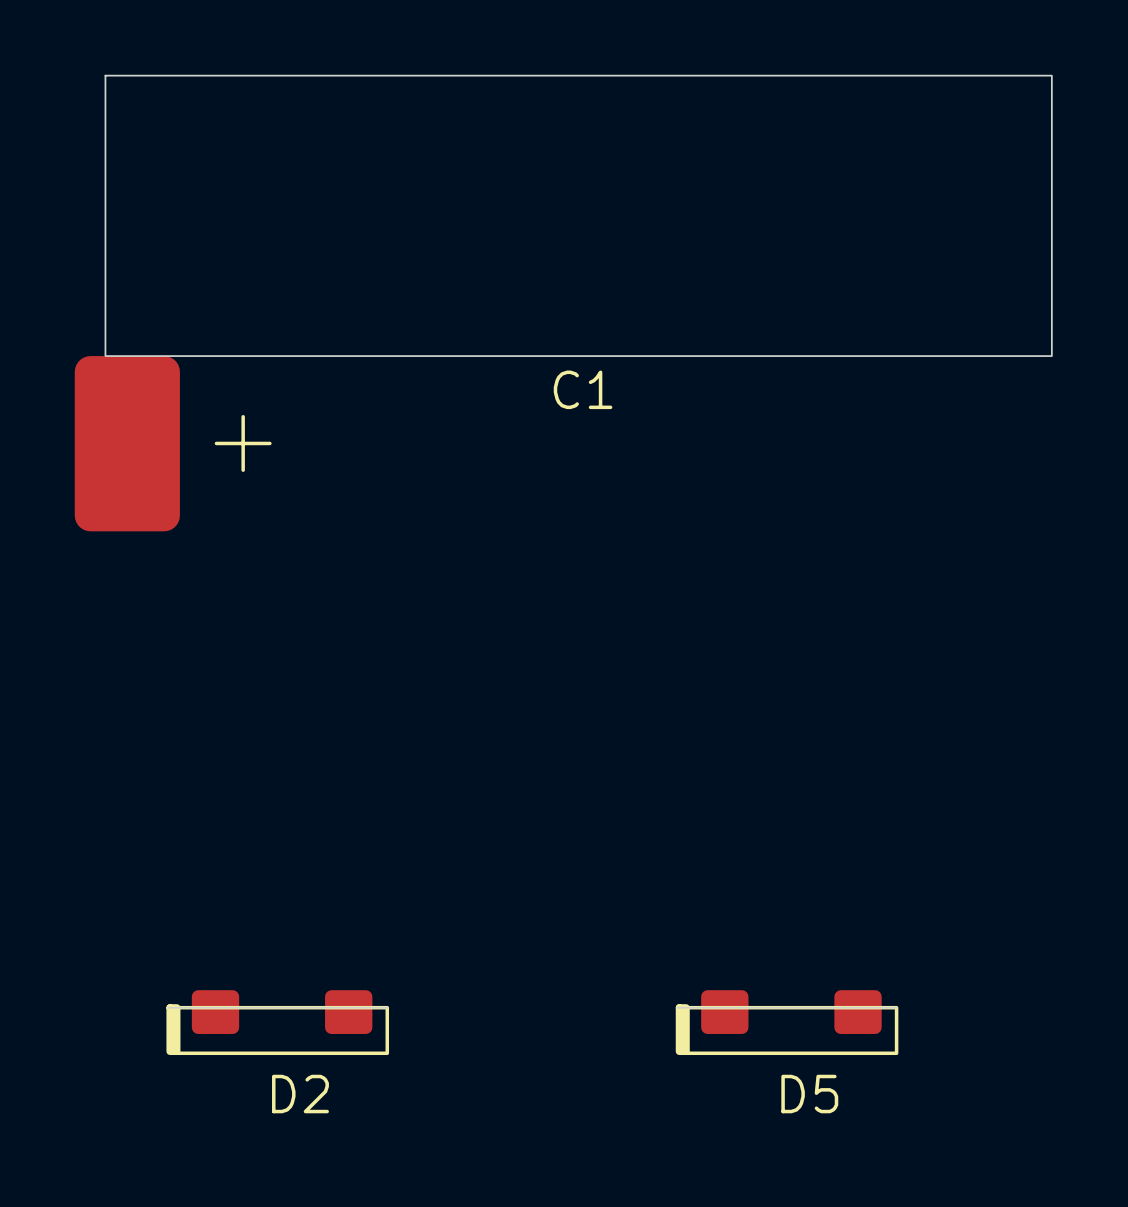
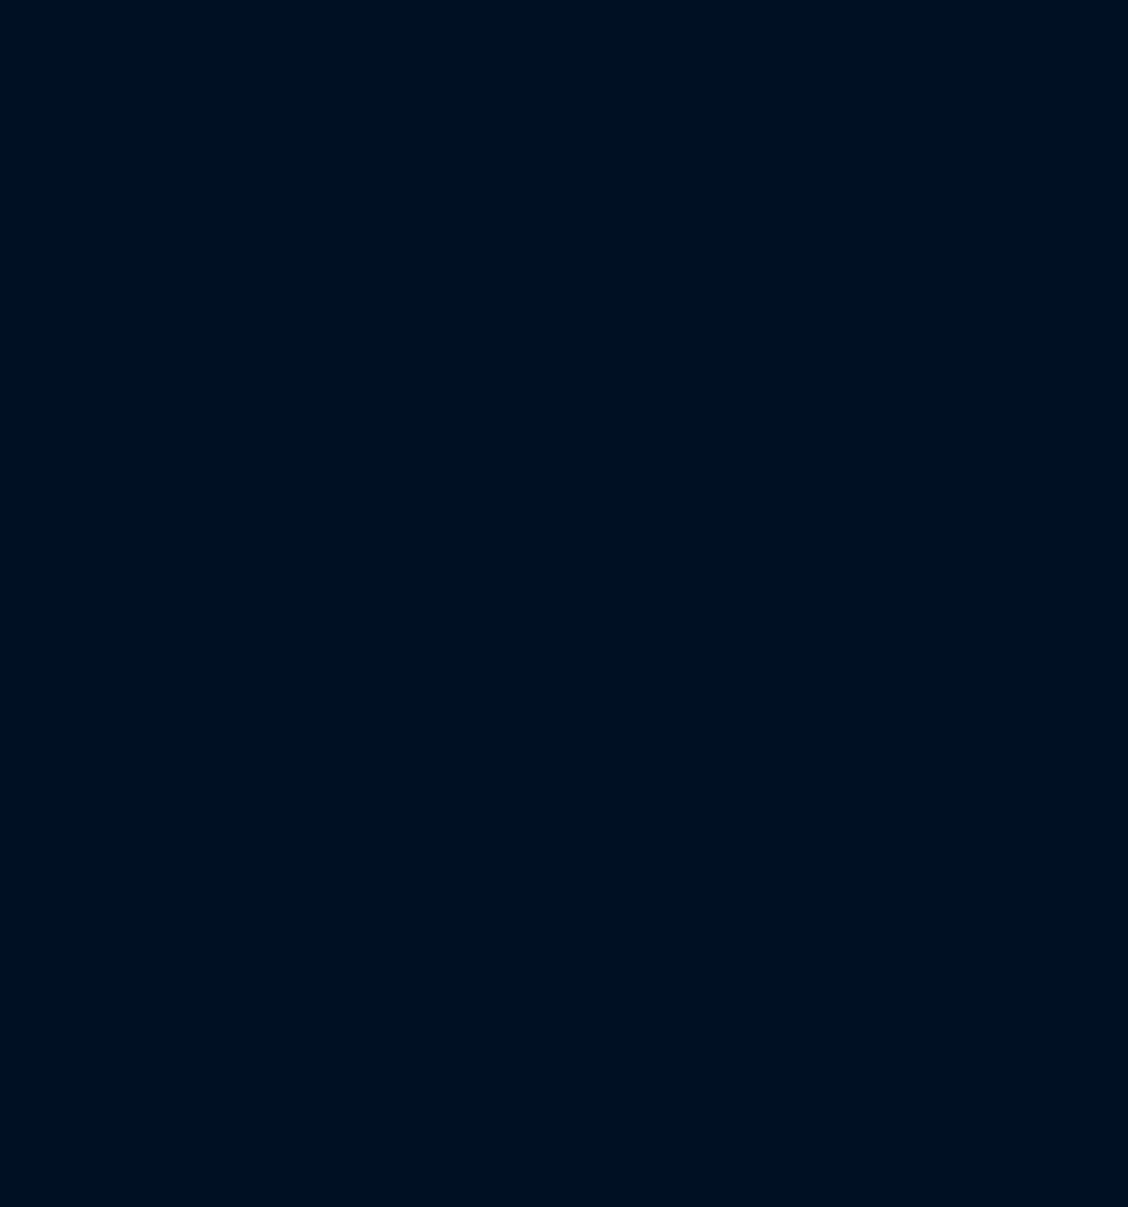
C1: (563, 303) -> none
D2: (277, 1022) -> none
D5: (787, 1022) -> none

